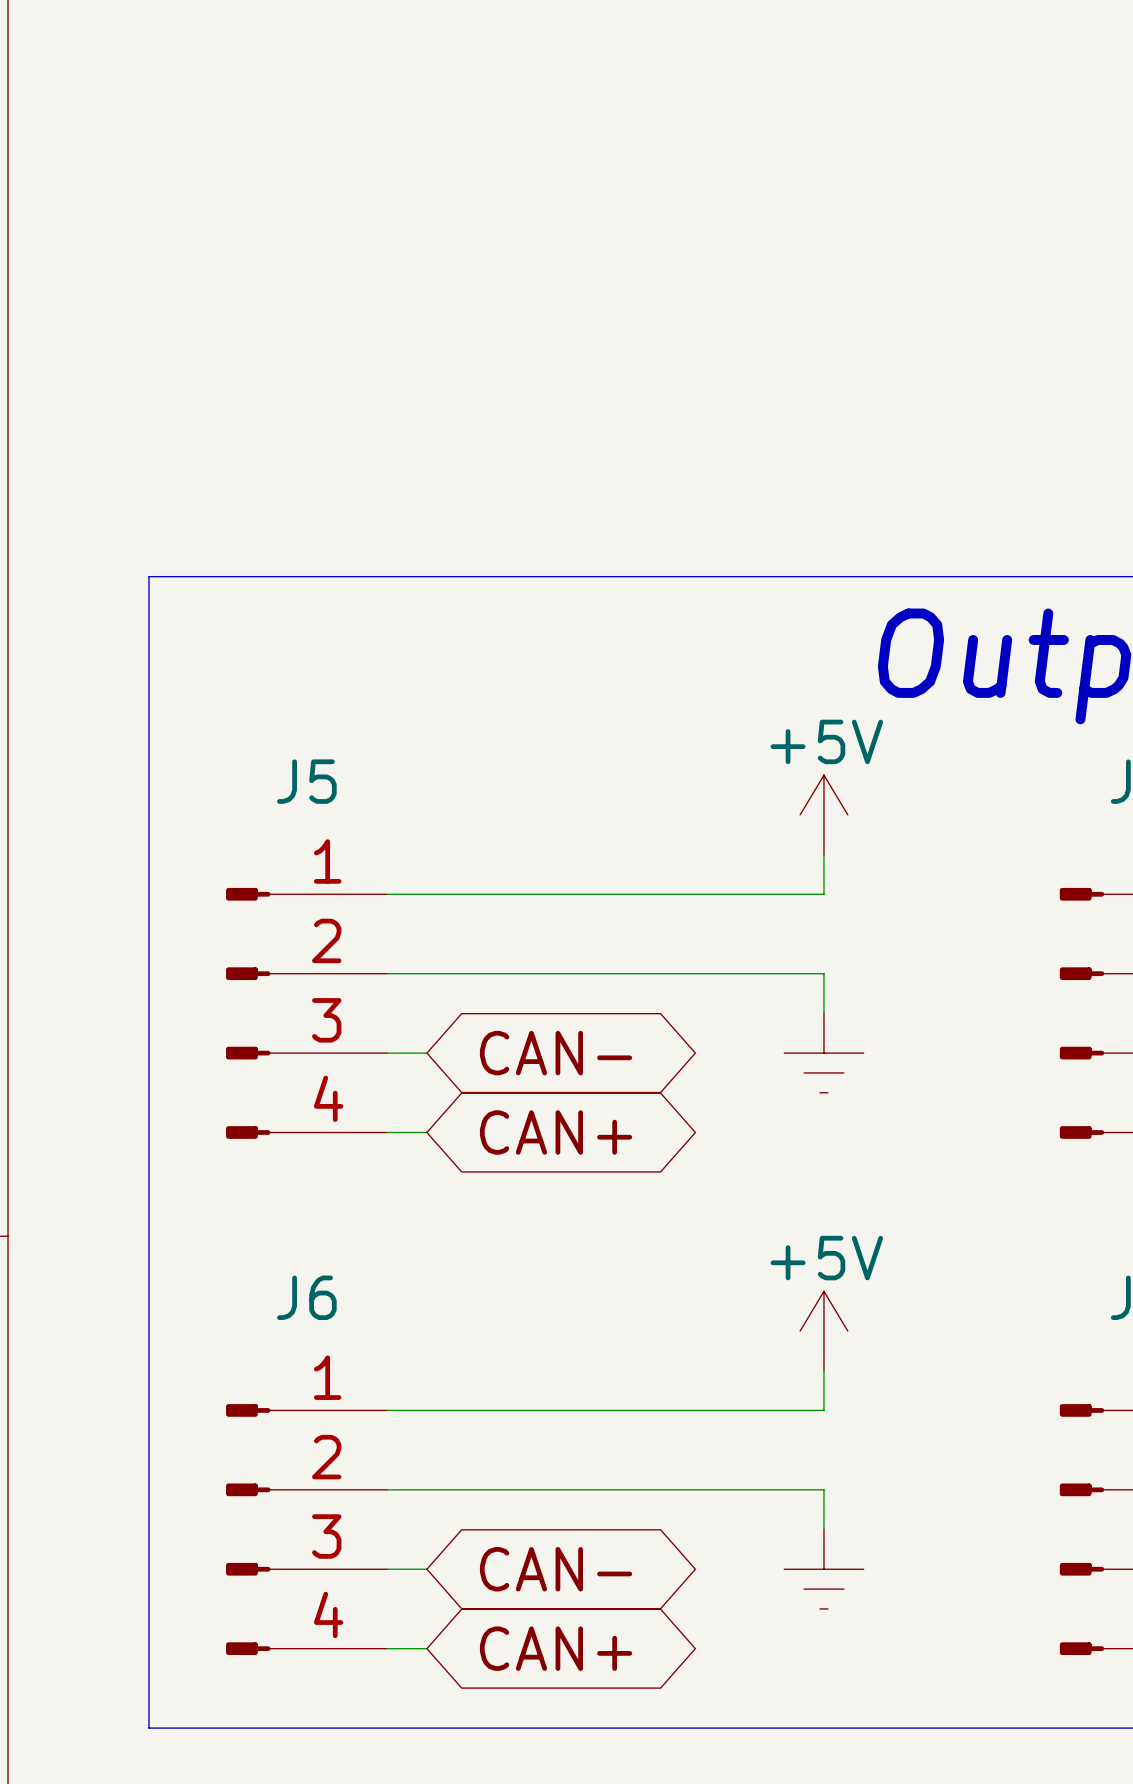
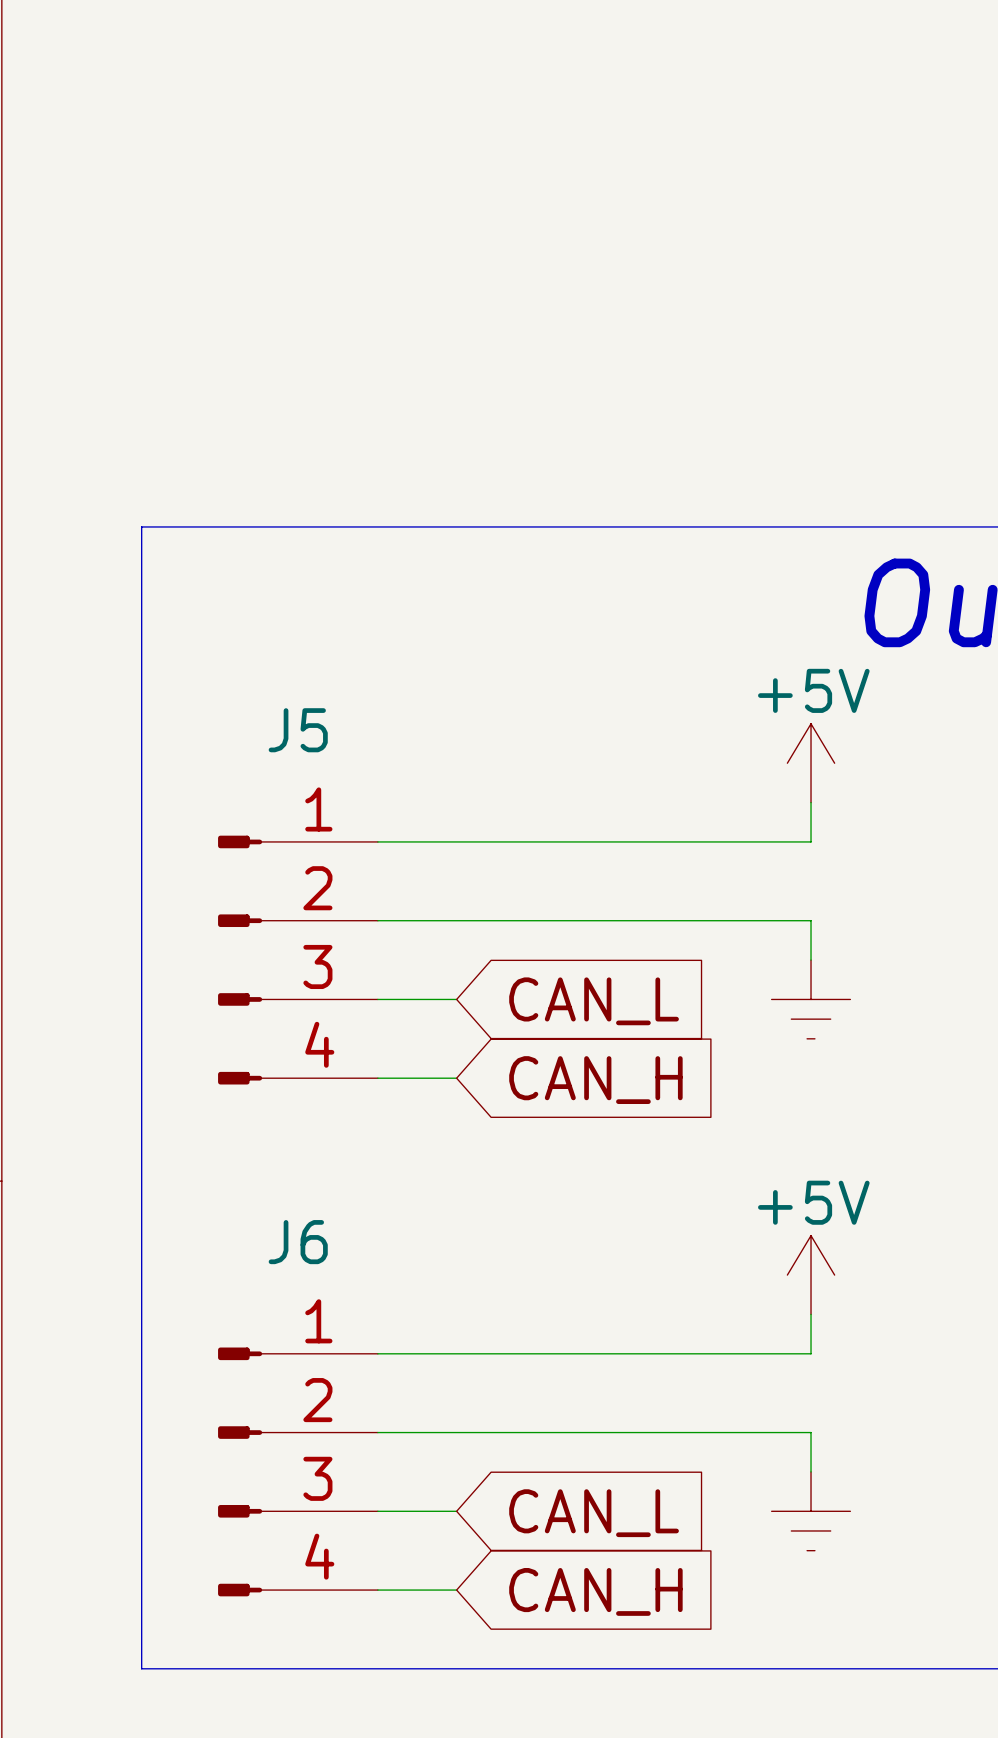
wire: none -> (417, 999) (456, 999)
global label shape: bidirectional (556, 1053) -> input (594, 1001)
global label: CAN- (556, 1053) -> CAN_L (594, 1001)
wire: none -> (417, 1078) (456, 1078)
global label shape: bidirectional (556, 1132) -> input (595, 1080)
global label: CAN+ (556, 1132) -> CAN_H (595, 1080)
wire: none -> (417, 1511) (456, 1511)
global label shape: bidirectional (556, 1569) -> input (594, 1513)
global label: CAN- (556, 1569) -> CAN_L (594, 1513)
wire: none -> (417, 1590) (456, 1590)
global label shape: bidirectional (556, 1648) -> input (595, 1591)
global label: CAN+ (556, 1648) -> CAN_H (595, 1591)

